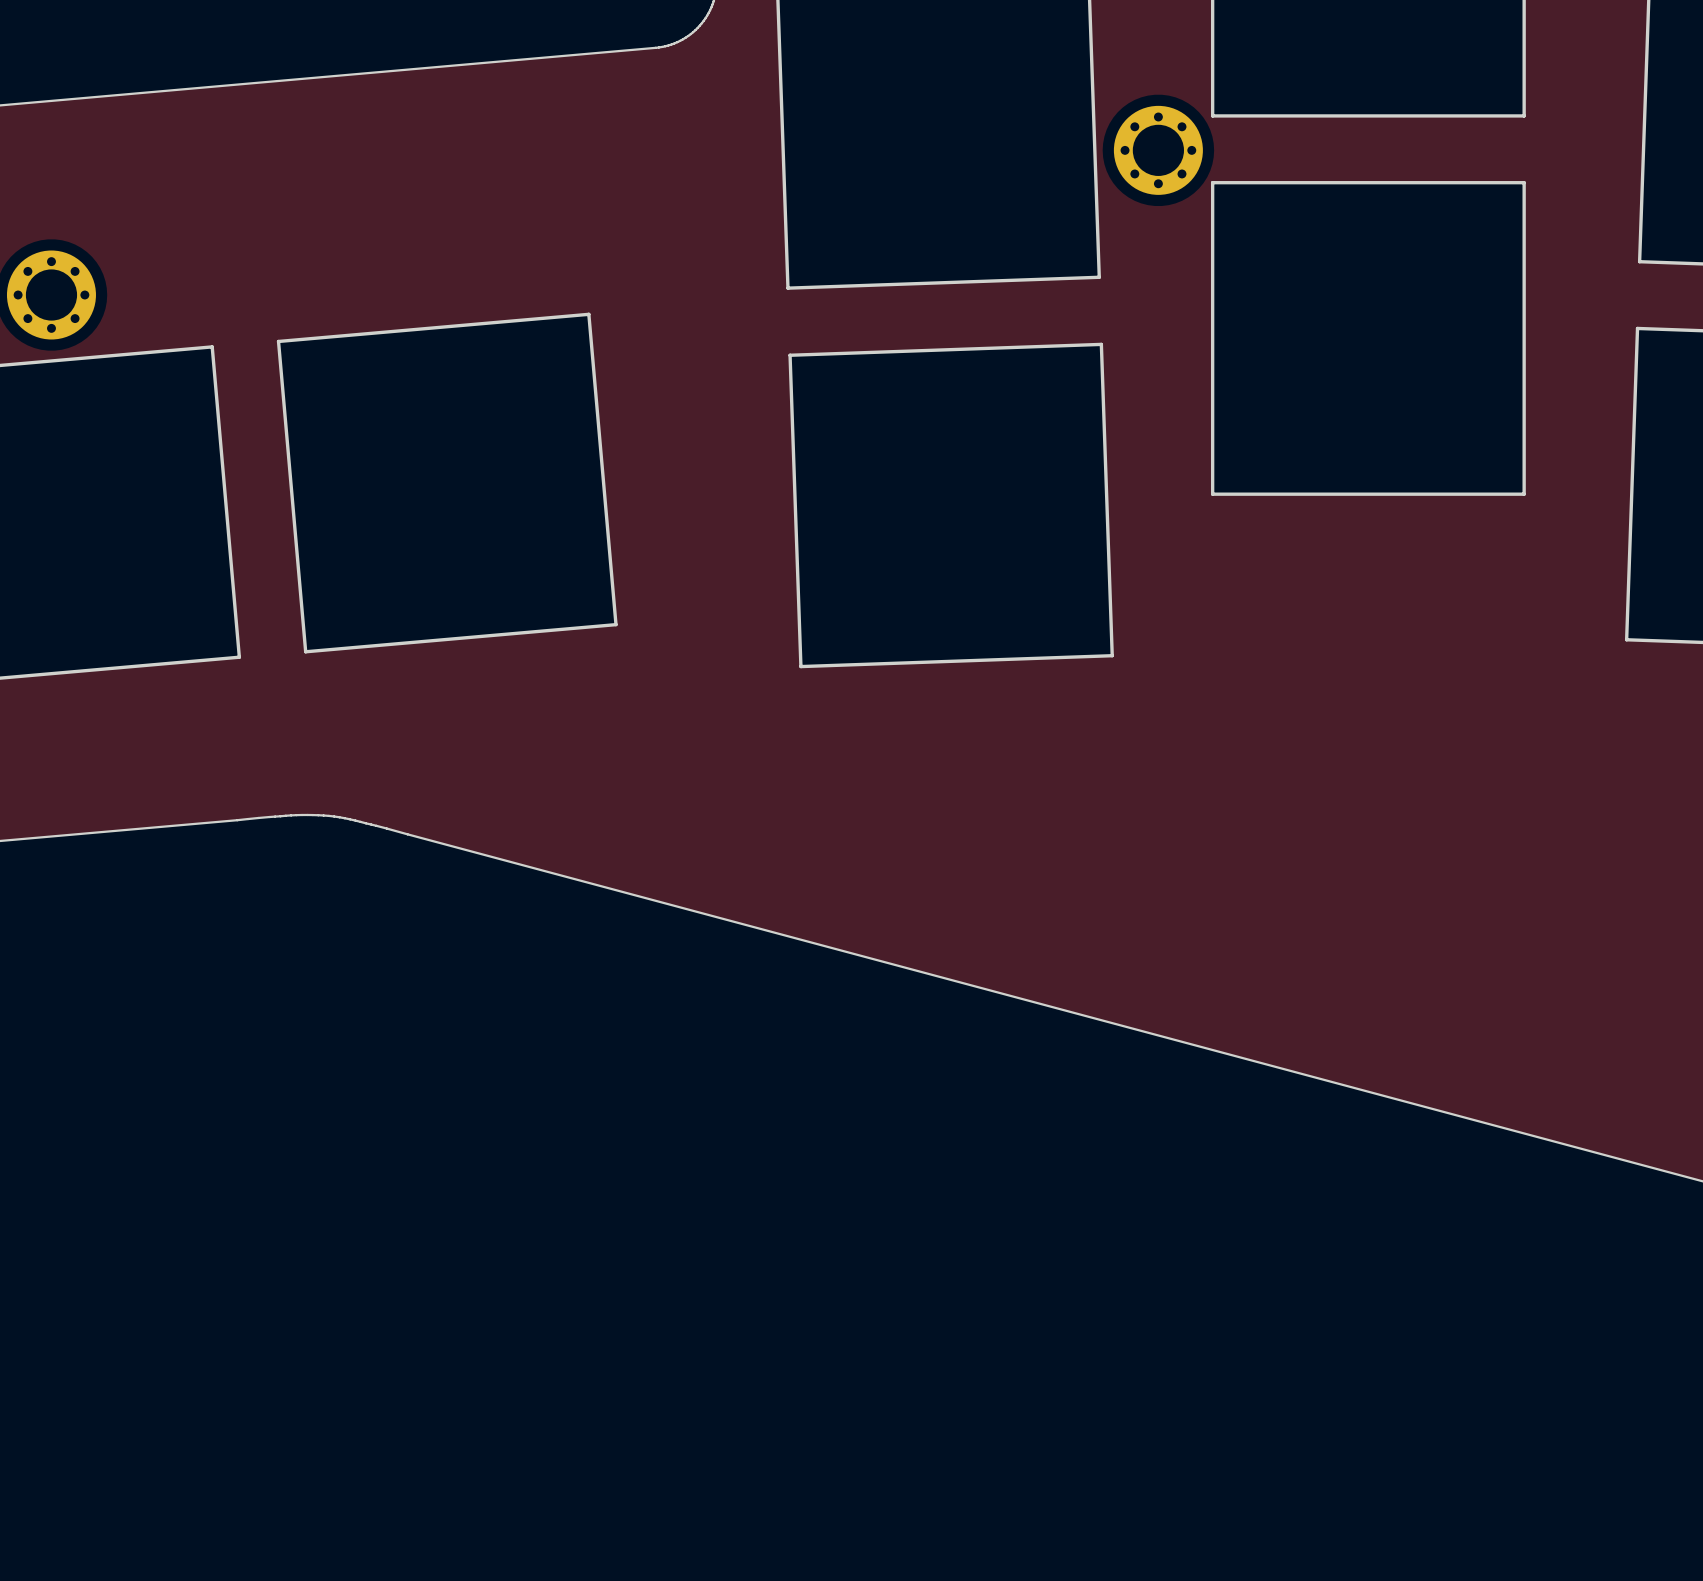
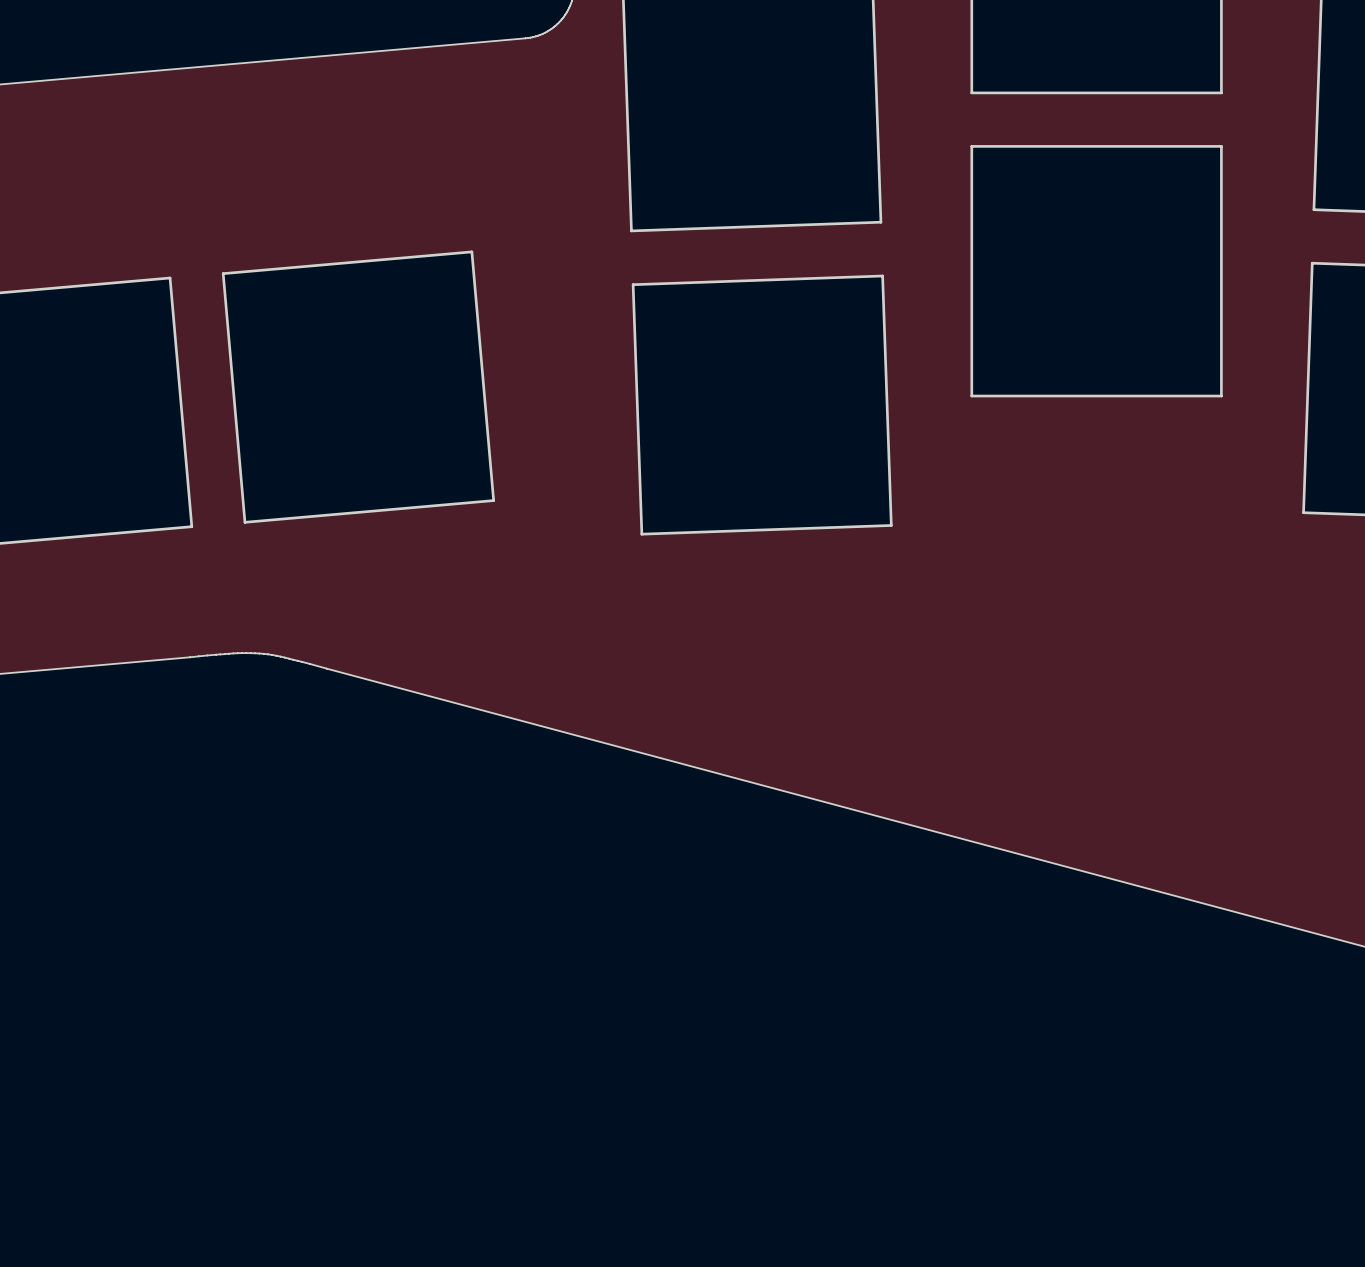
part: (1158, 150) -> none
part: (51, 295) -> none

